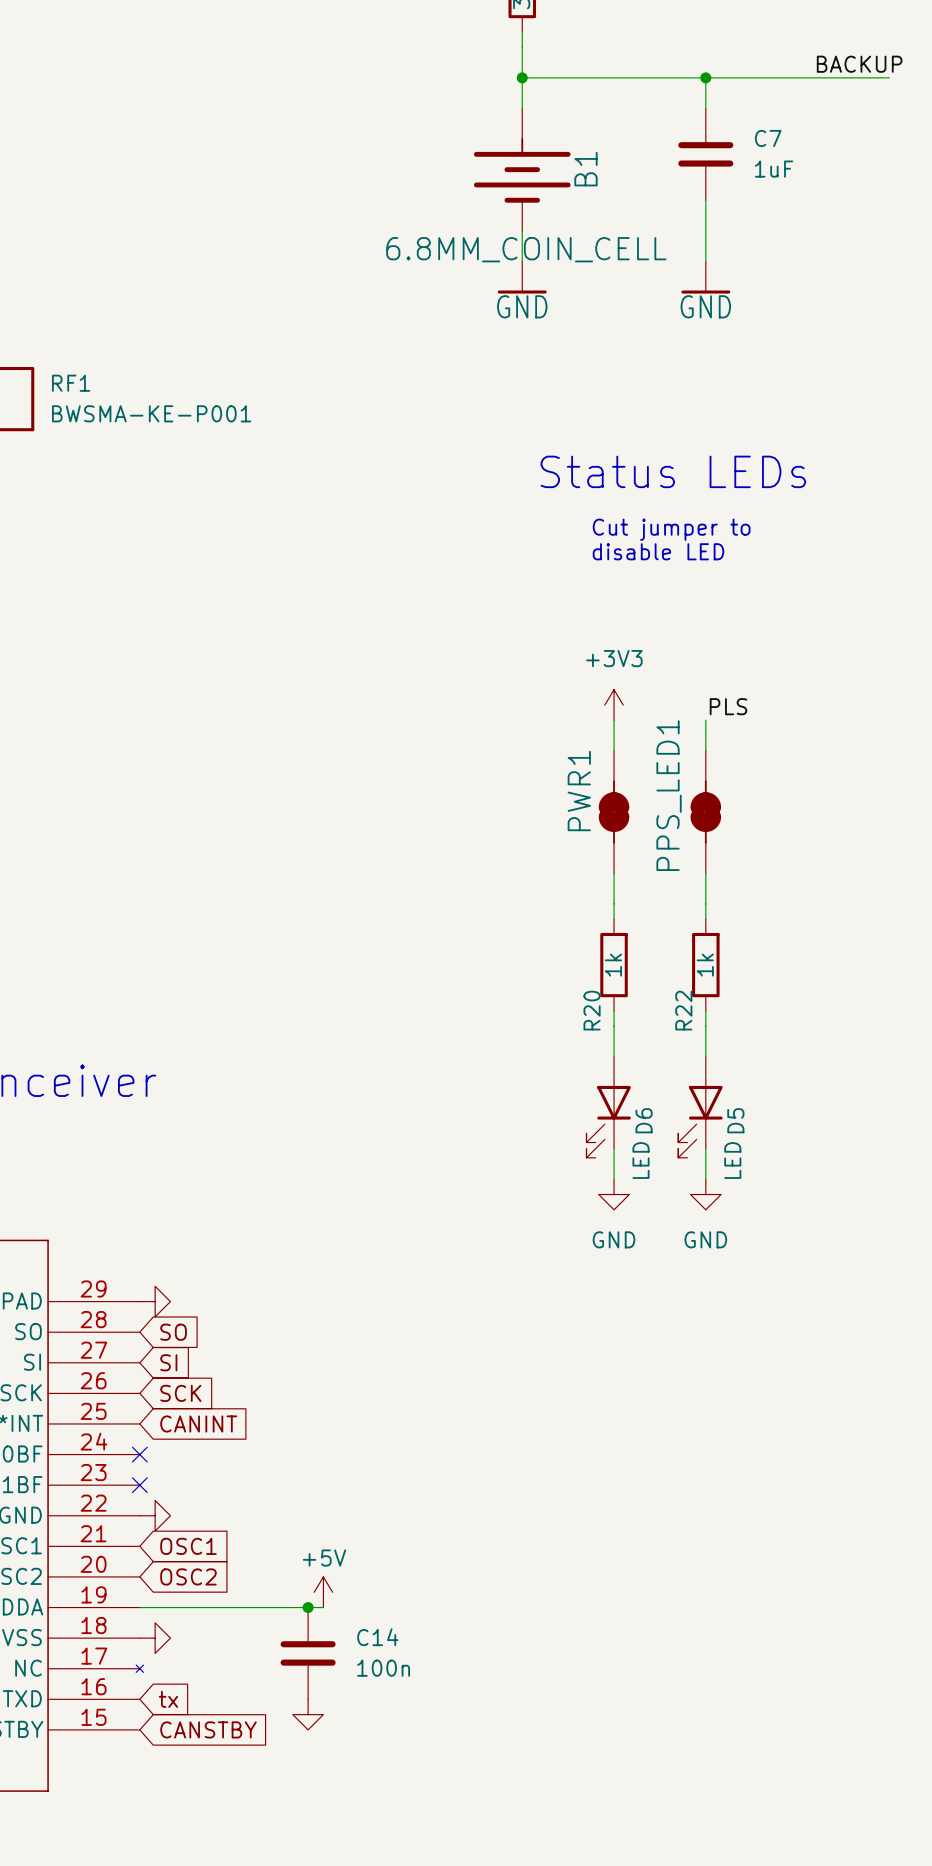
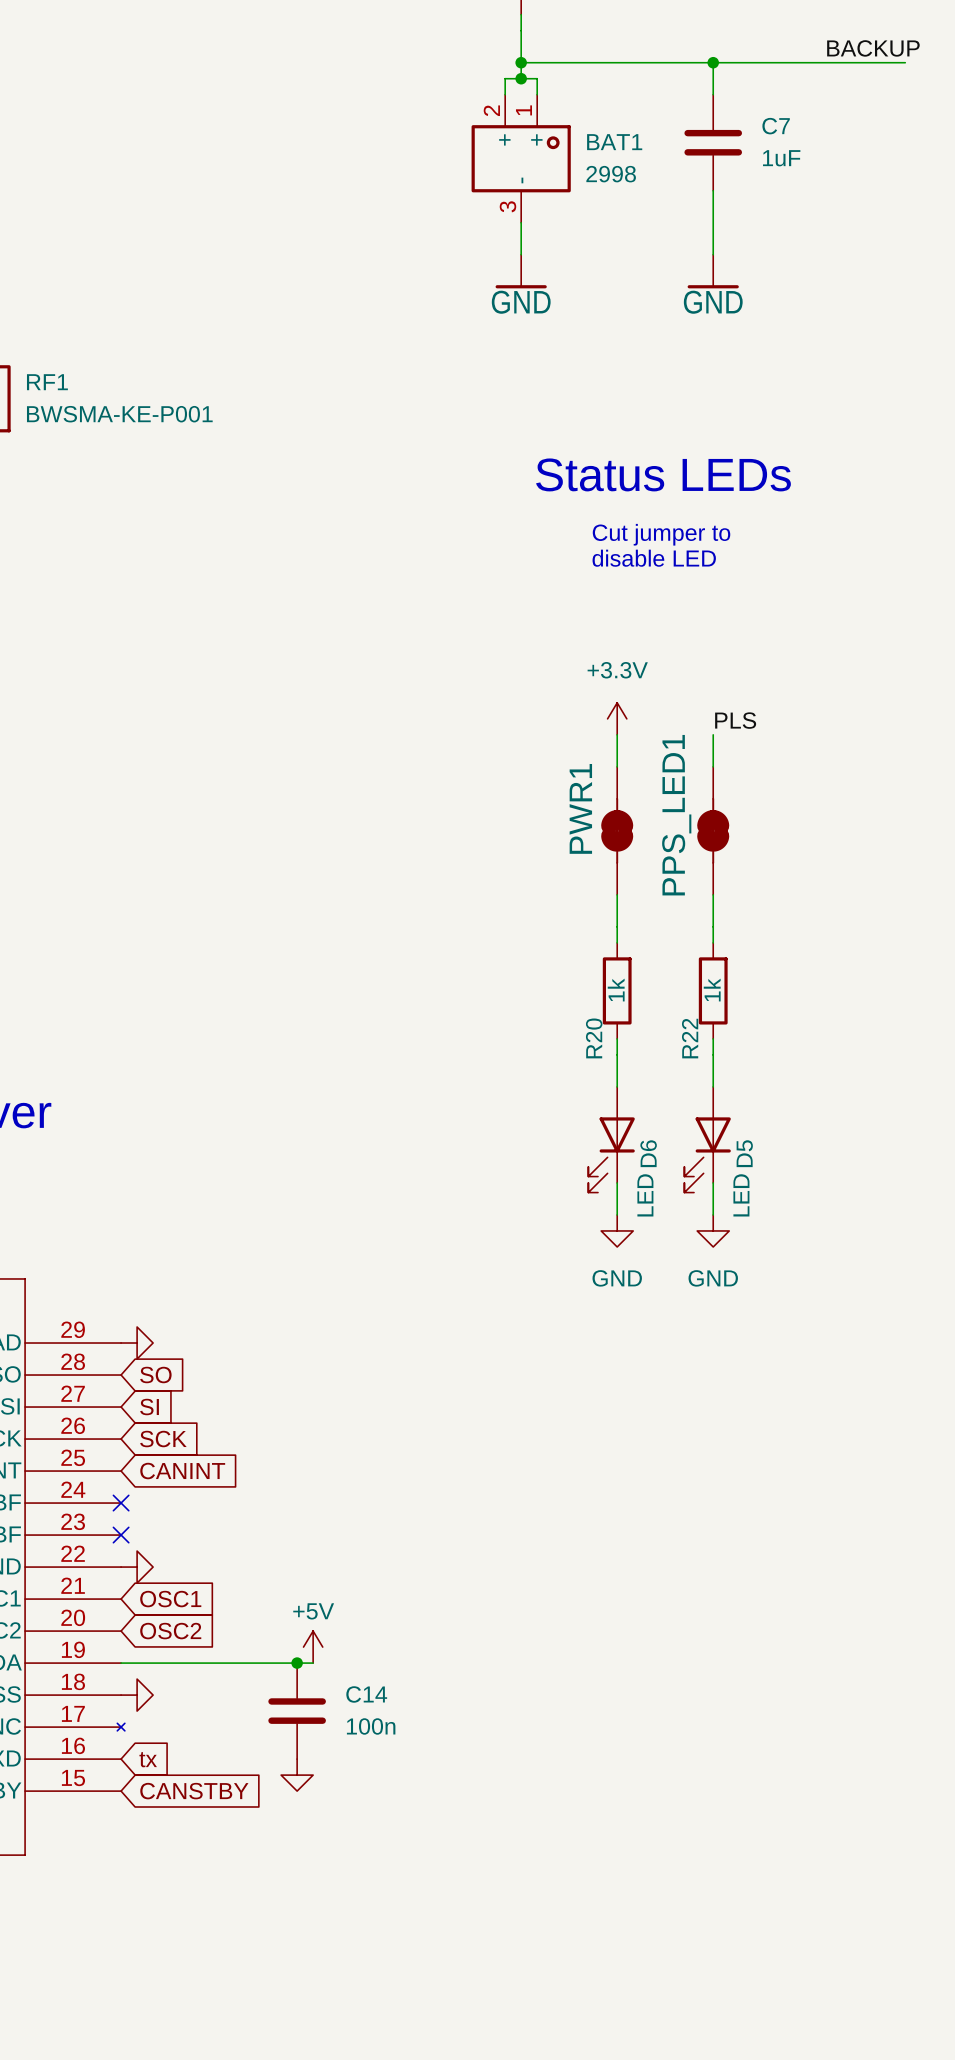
wire: (522, 93) (522, 108) -> none
junction: none -> (521, 78)
wire: none -> (505, 94) (505, 78) (537, 78) (537, 94)
B1: 6.8MM_COIN_CELL (522, 169) -> none
BAT1: none -> 2998 (521, 158)
power symbol: +3V3 (614, 705) -> +3.3V (617, 718)

